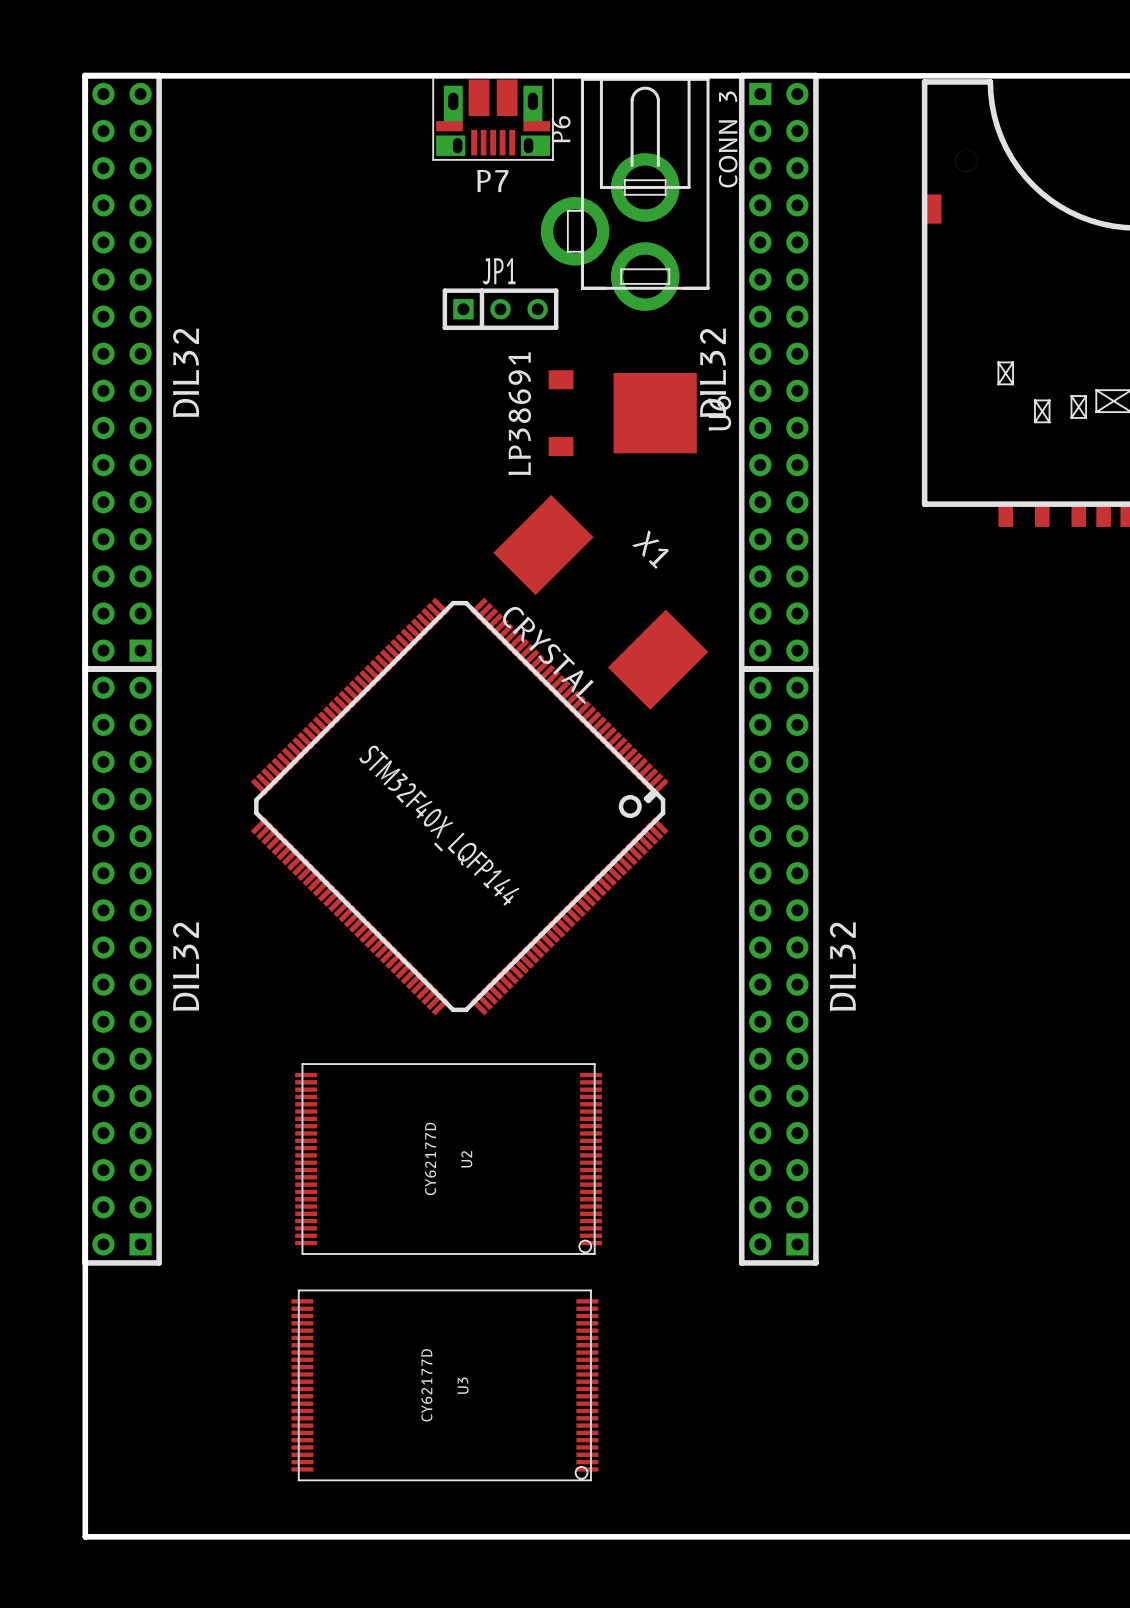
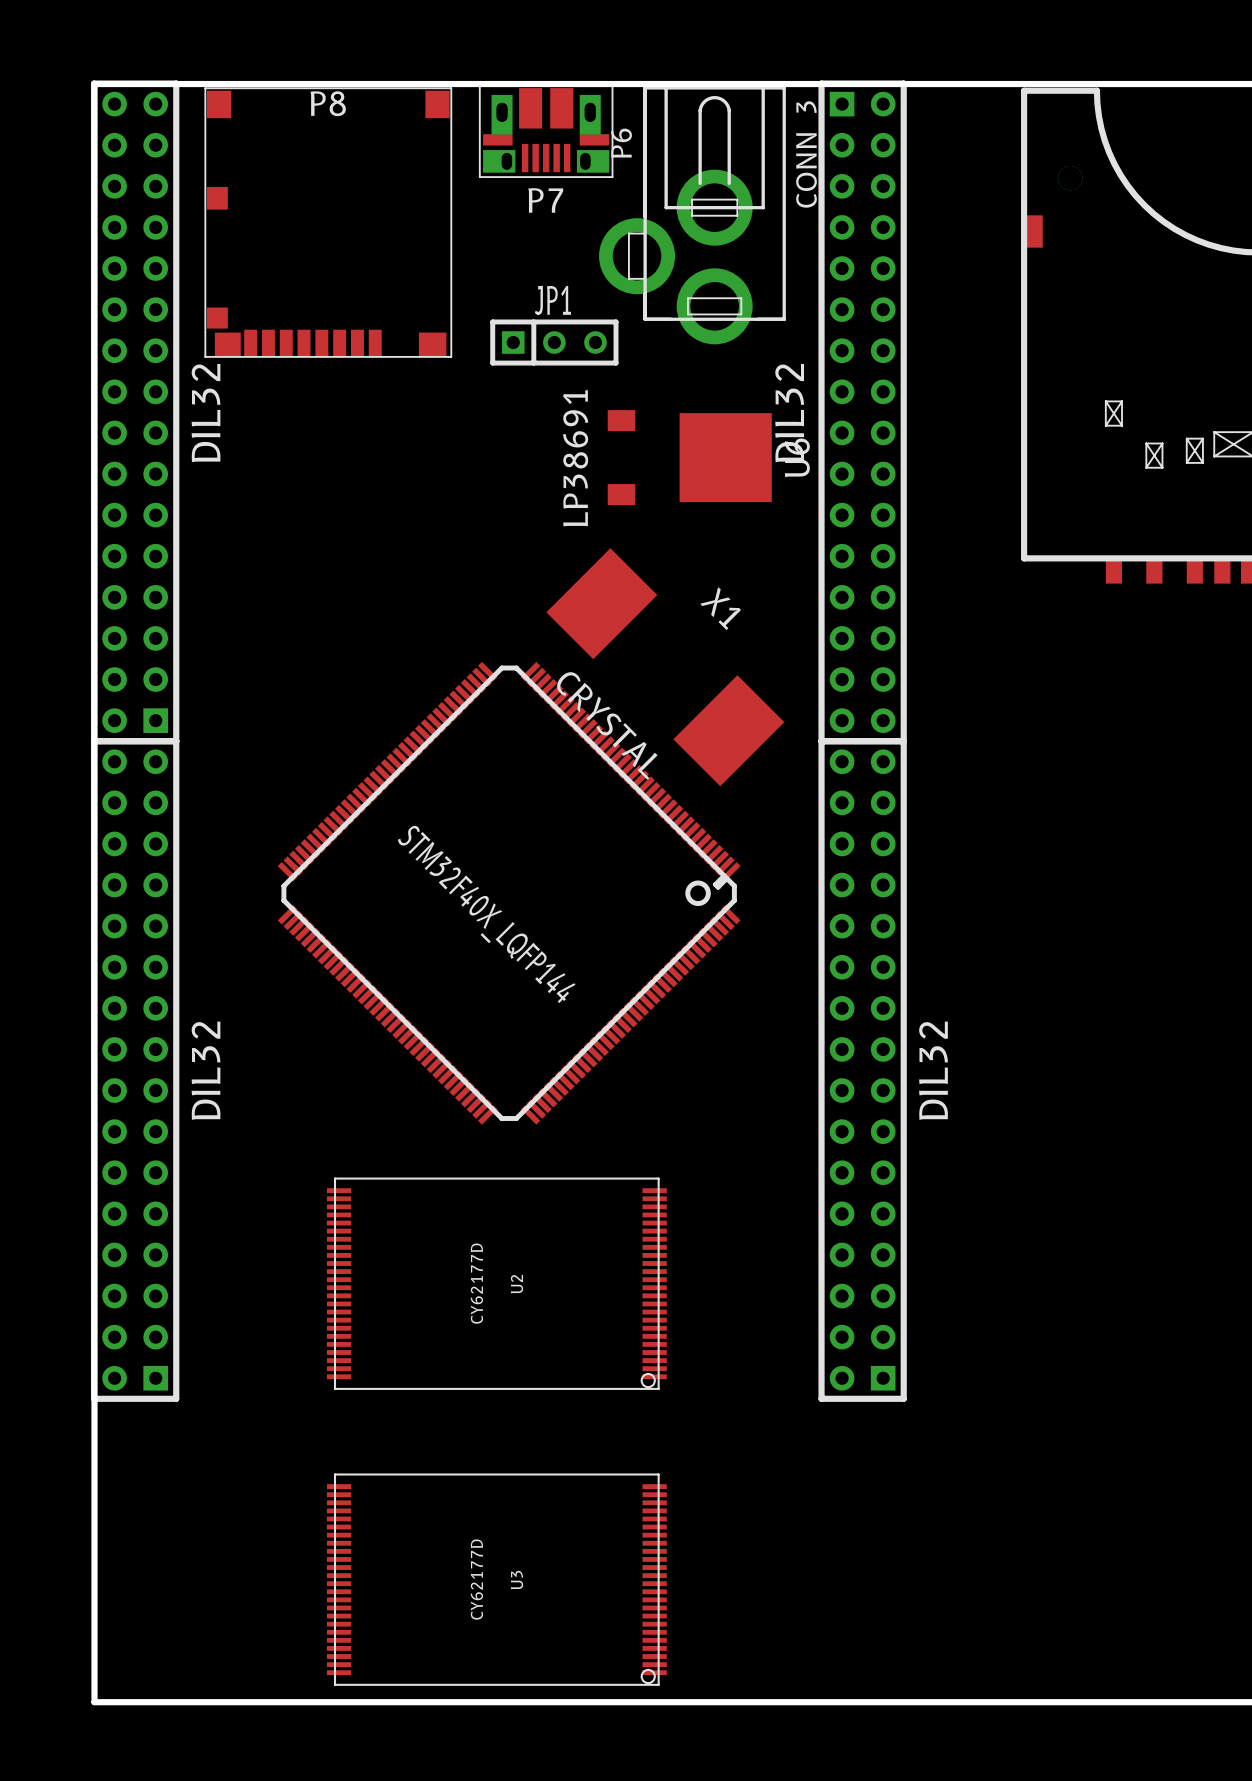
P8: none -> (328, 222)
U3 position: (444, 1385) -> (496, 1579)

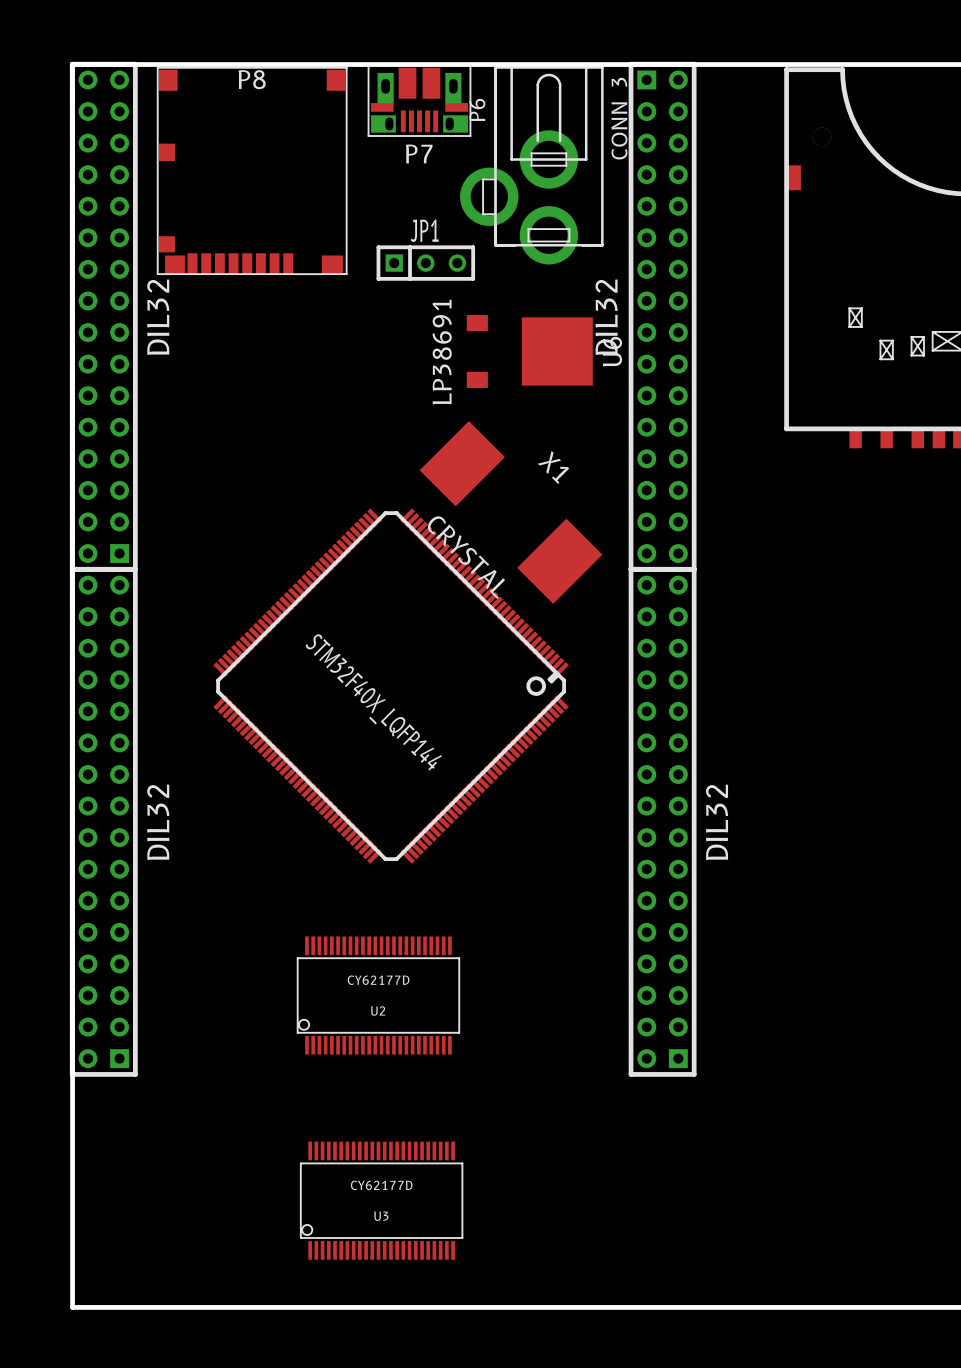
U2 footprint: [326, 1177, 667, 1390] -> [296, 936, 461, 1055]
U3 footprint: [326, 1473, 667, 1686] -> [300, 1141, 464, 1260]

